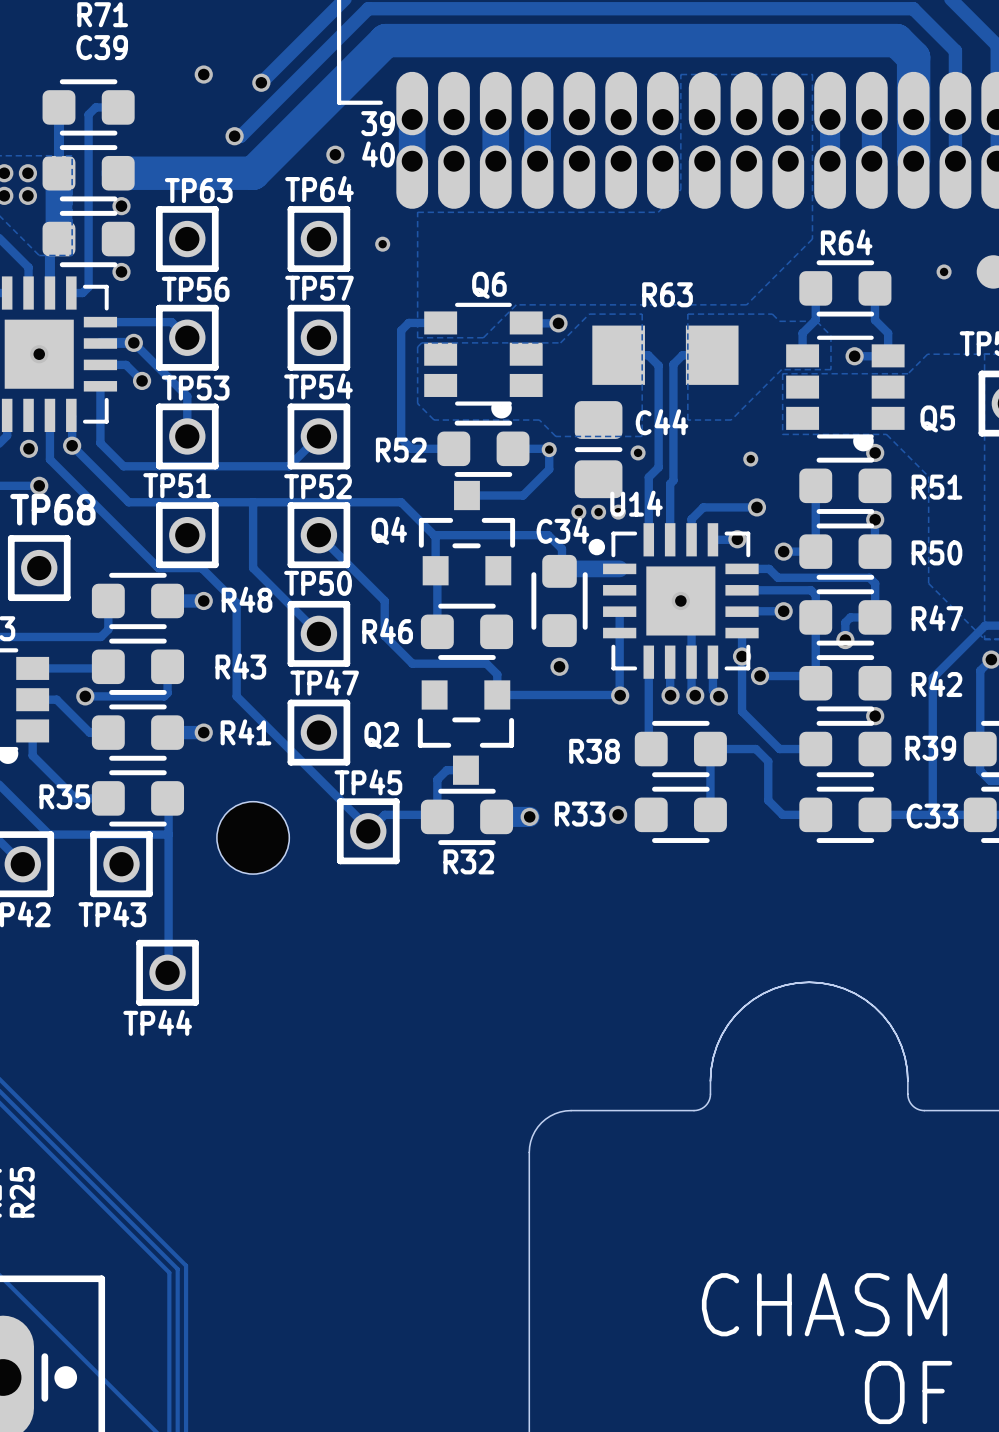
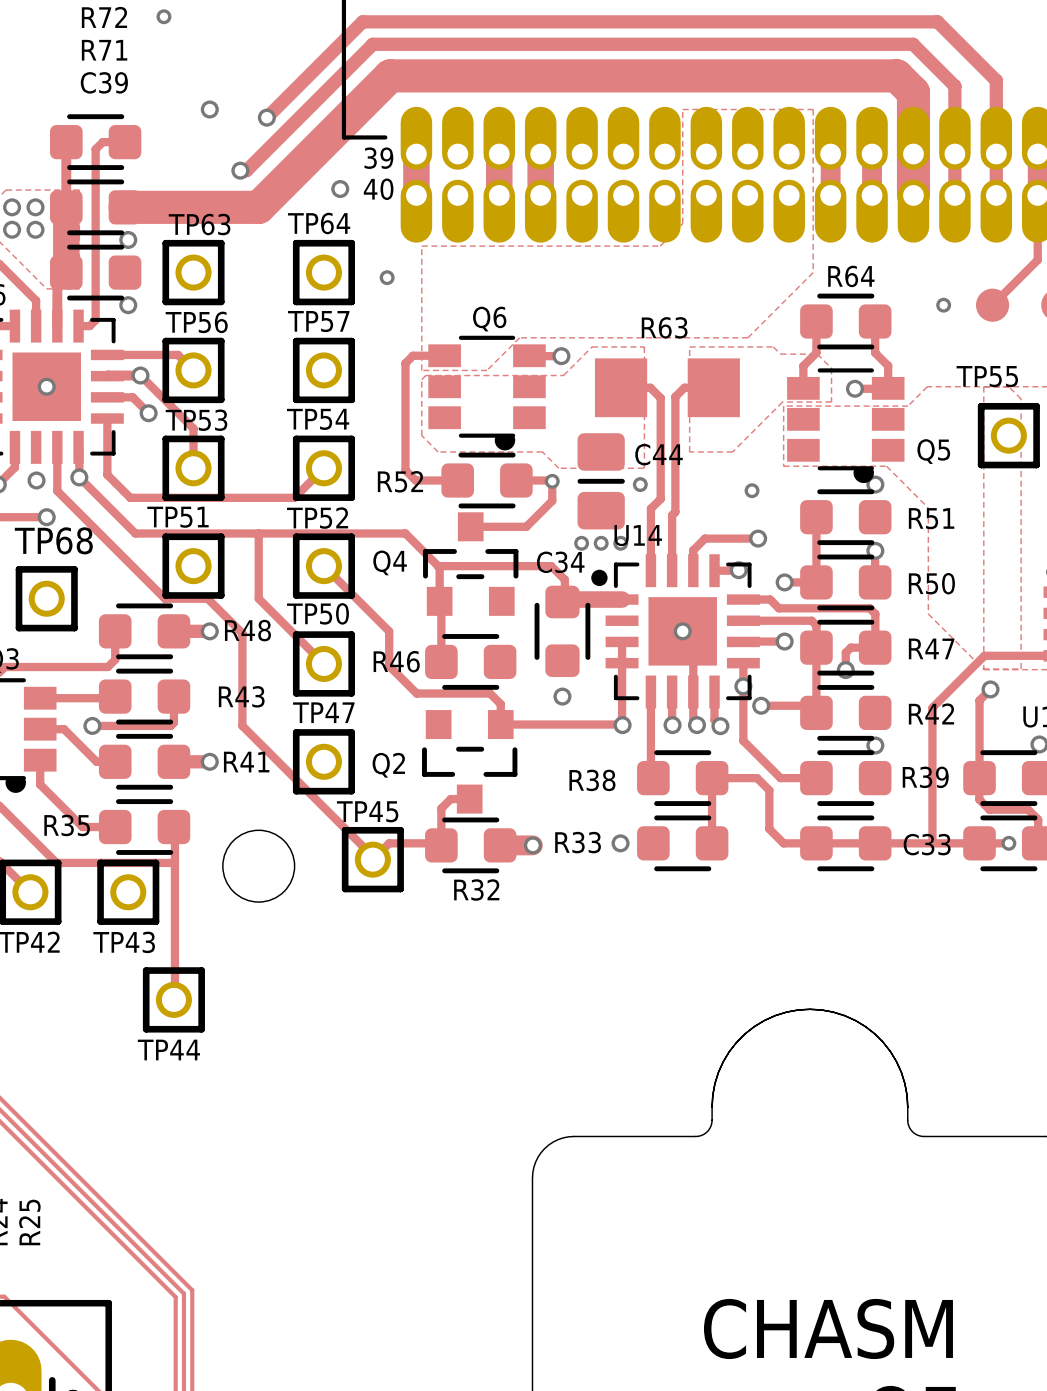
track: none -> (819, 843) (875, 843)

